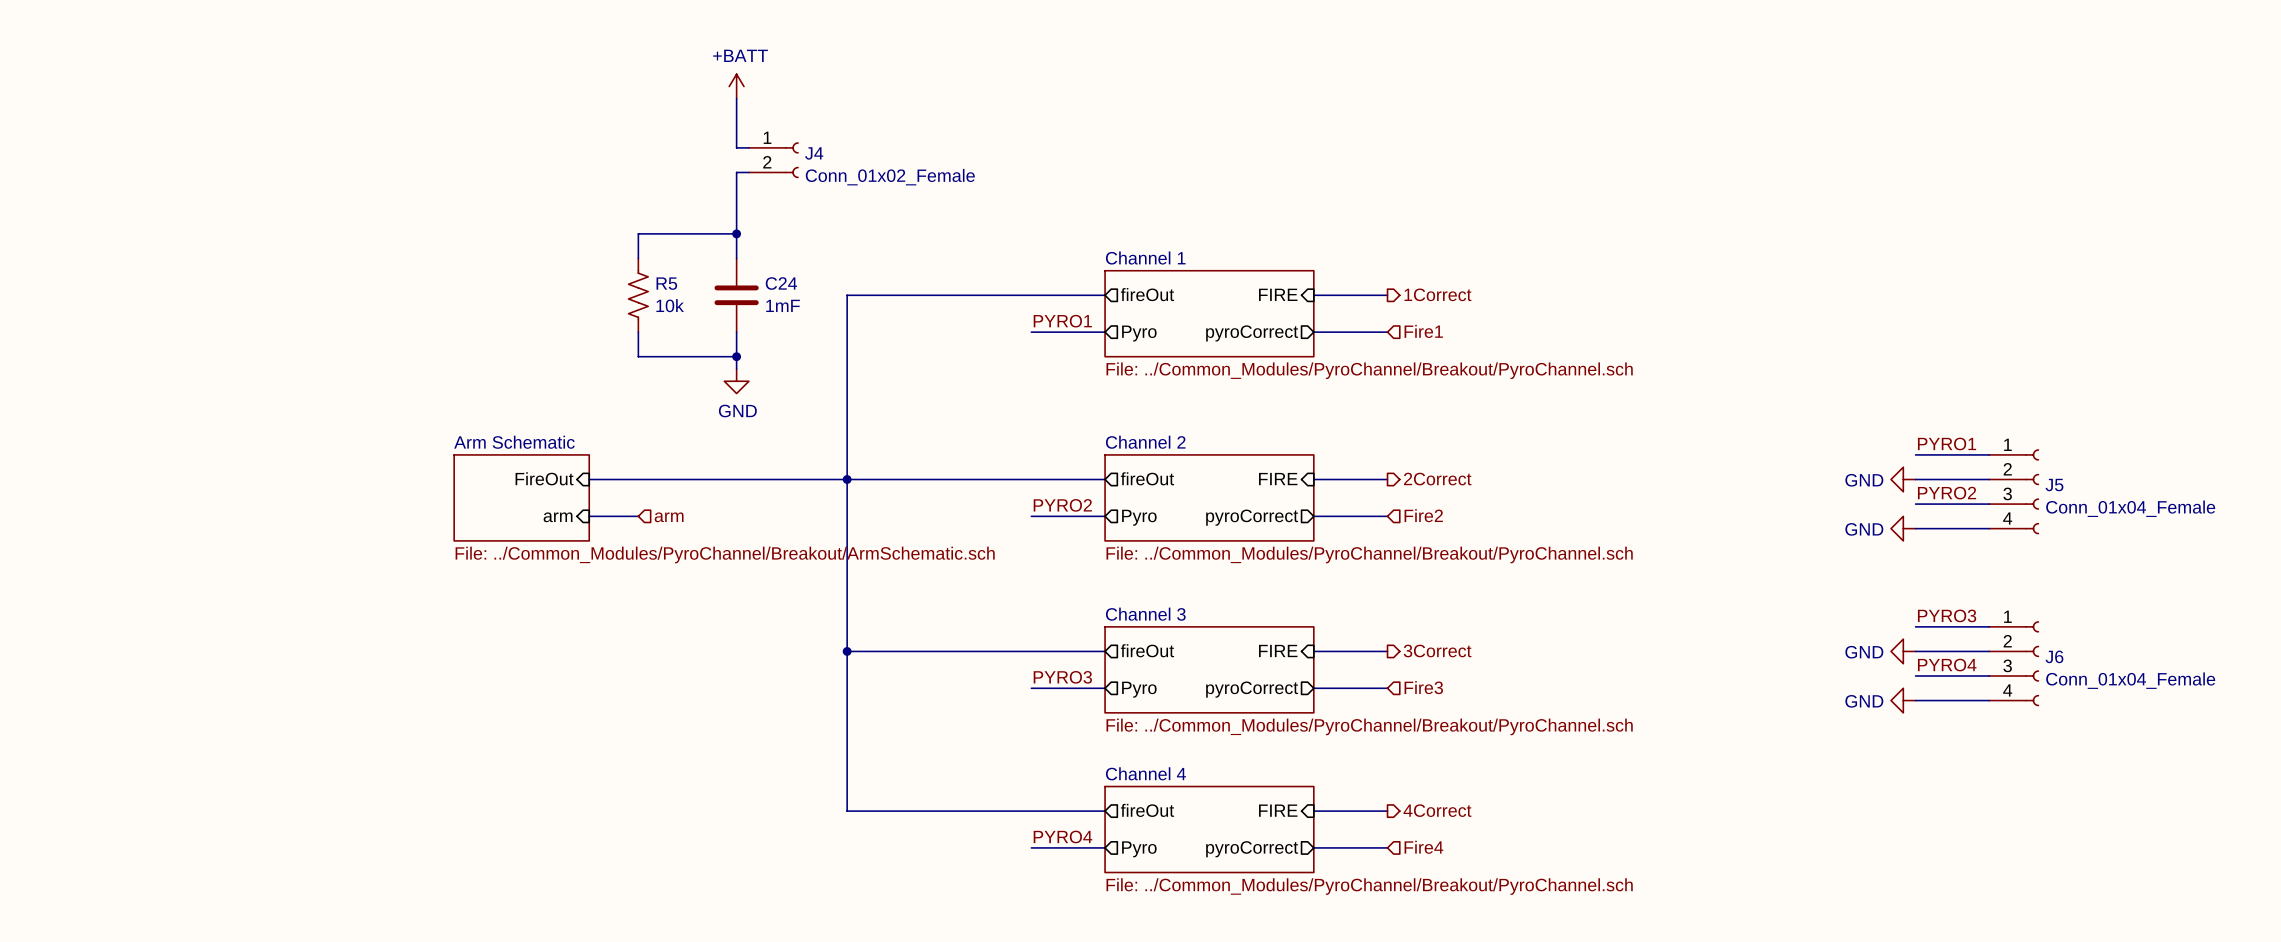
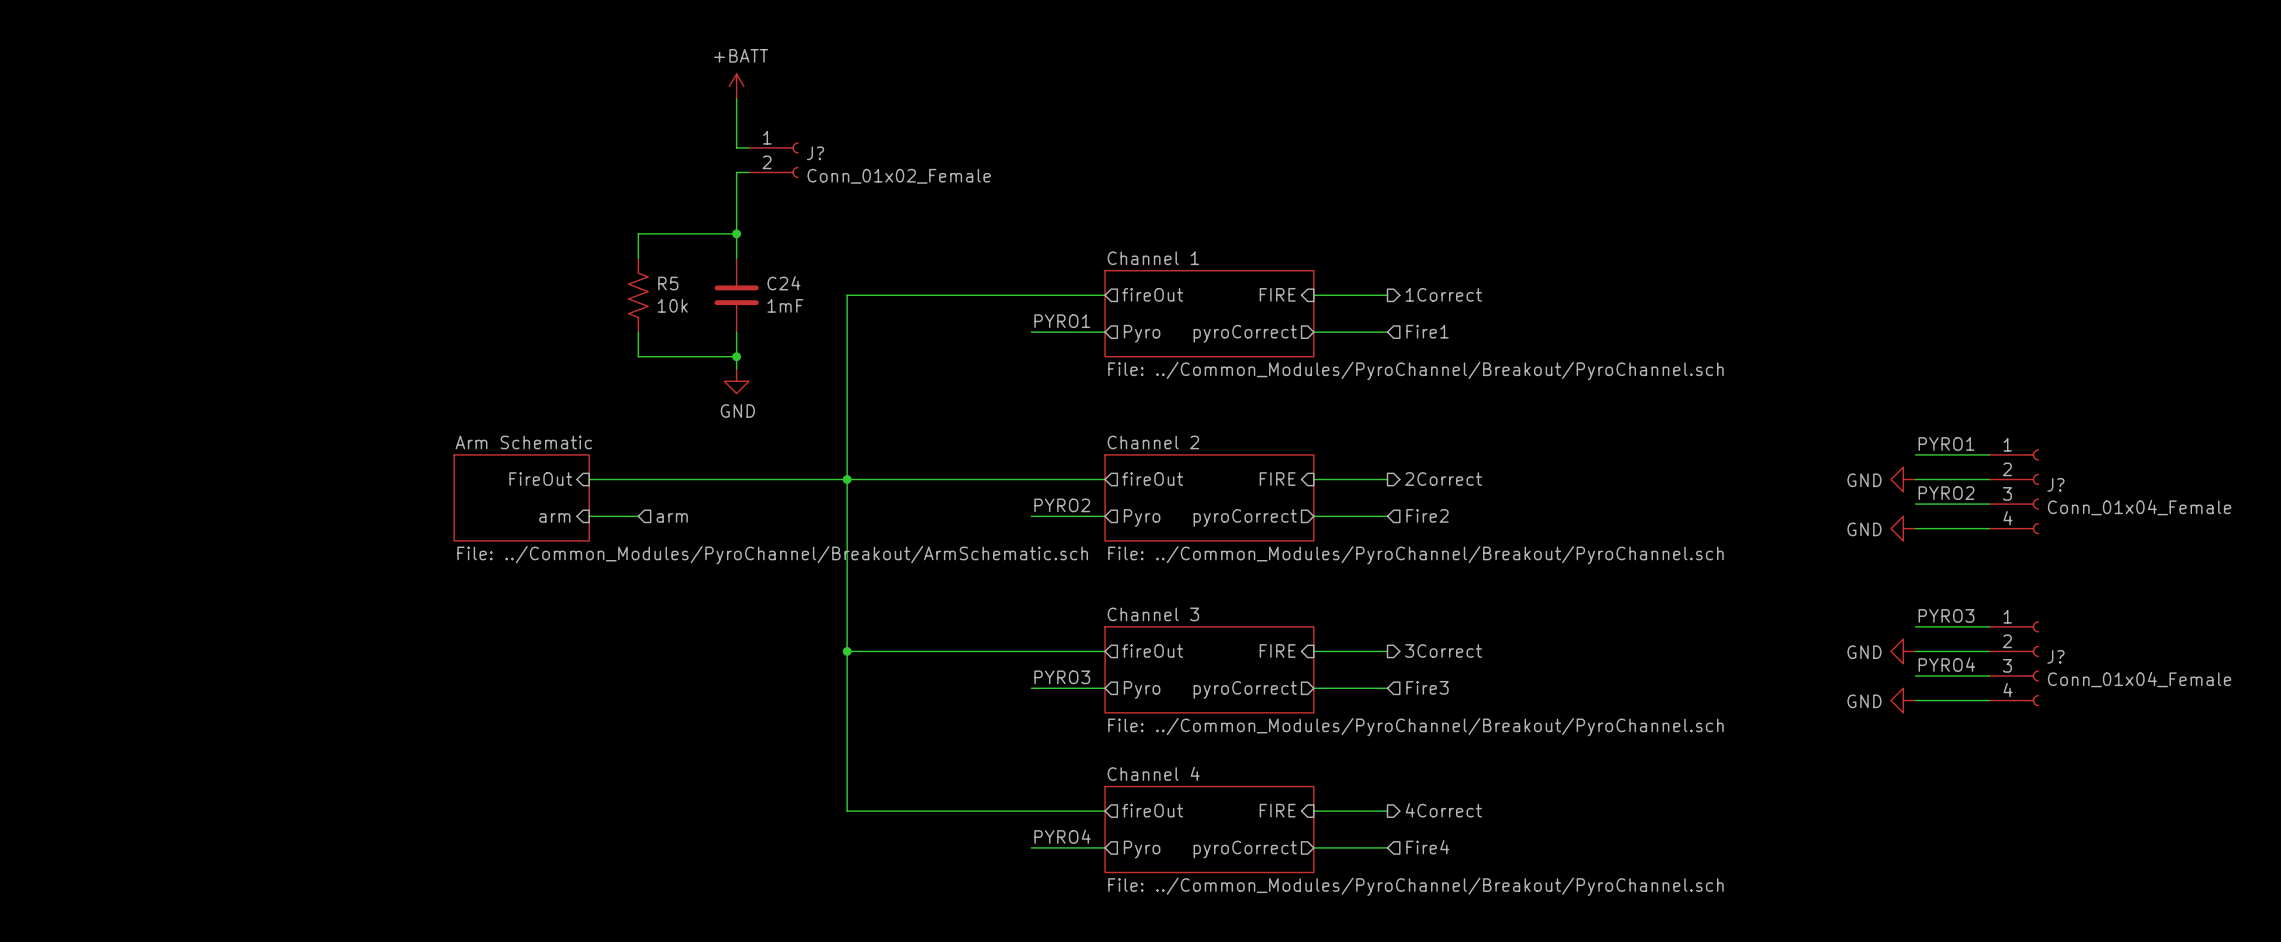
J4 name: J4 (814, 153) -> J? (815, 153)
J5 name: J5 (2054, 485) -> J? (2055, 484)
J6 name: J6 (2054, 656) -> J? (2055, 656)

